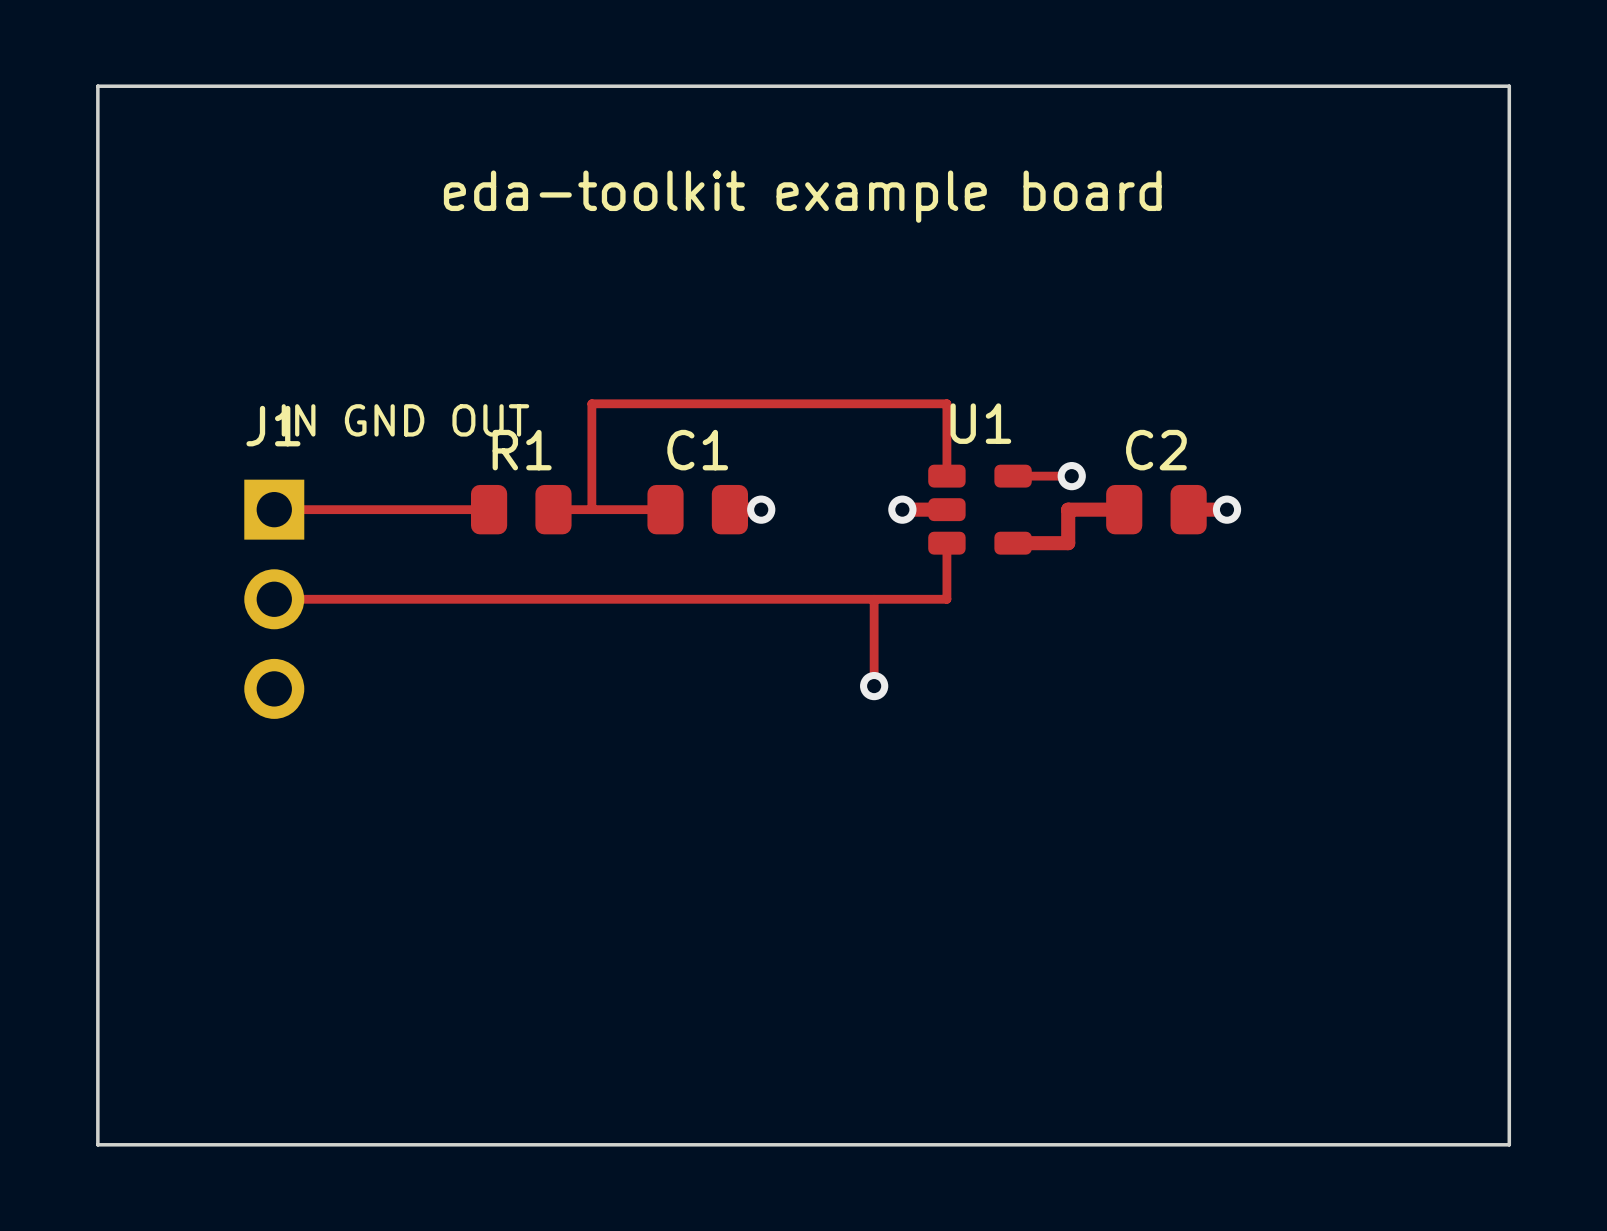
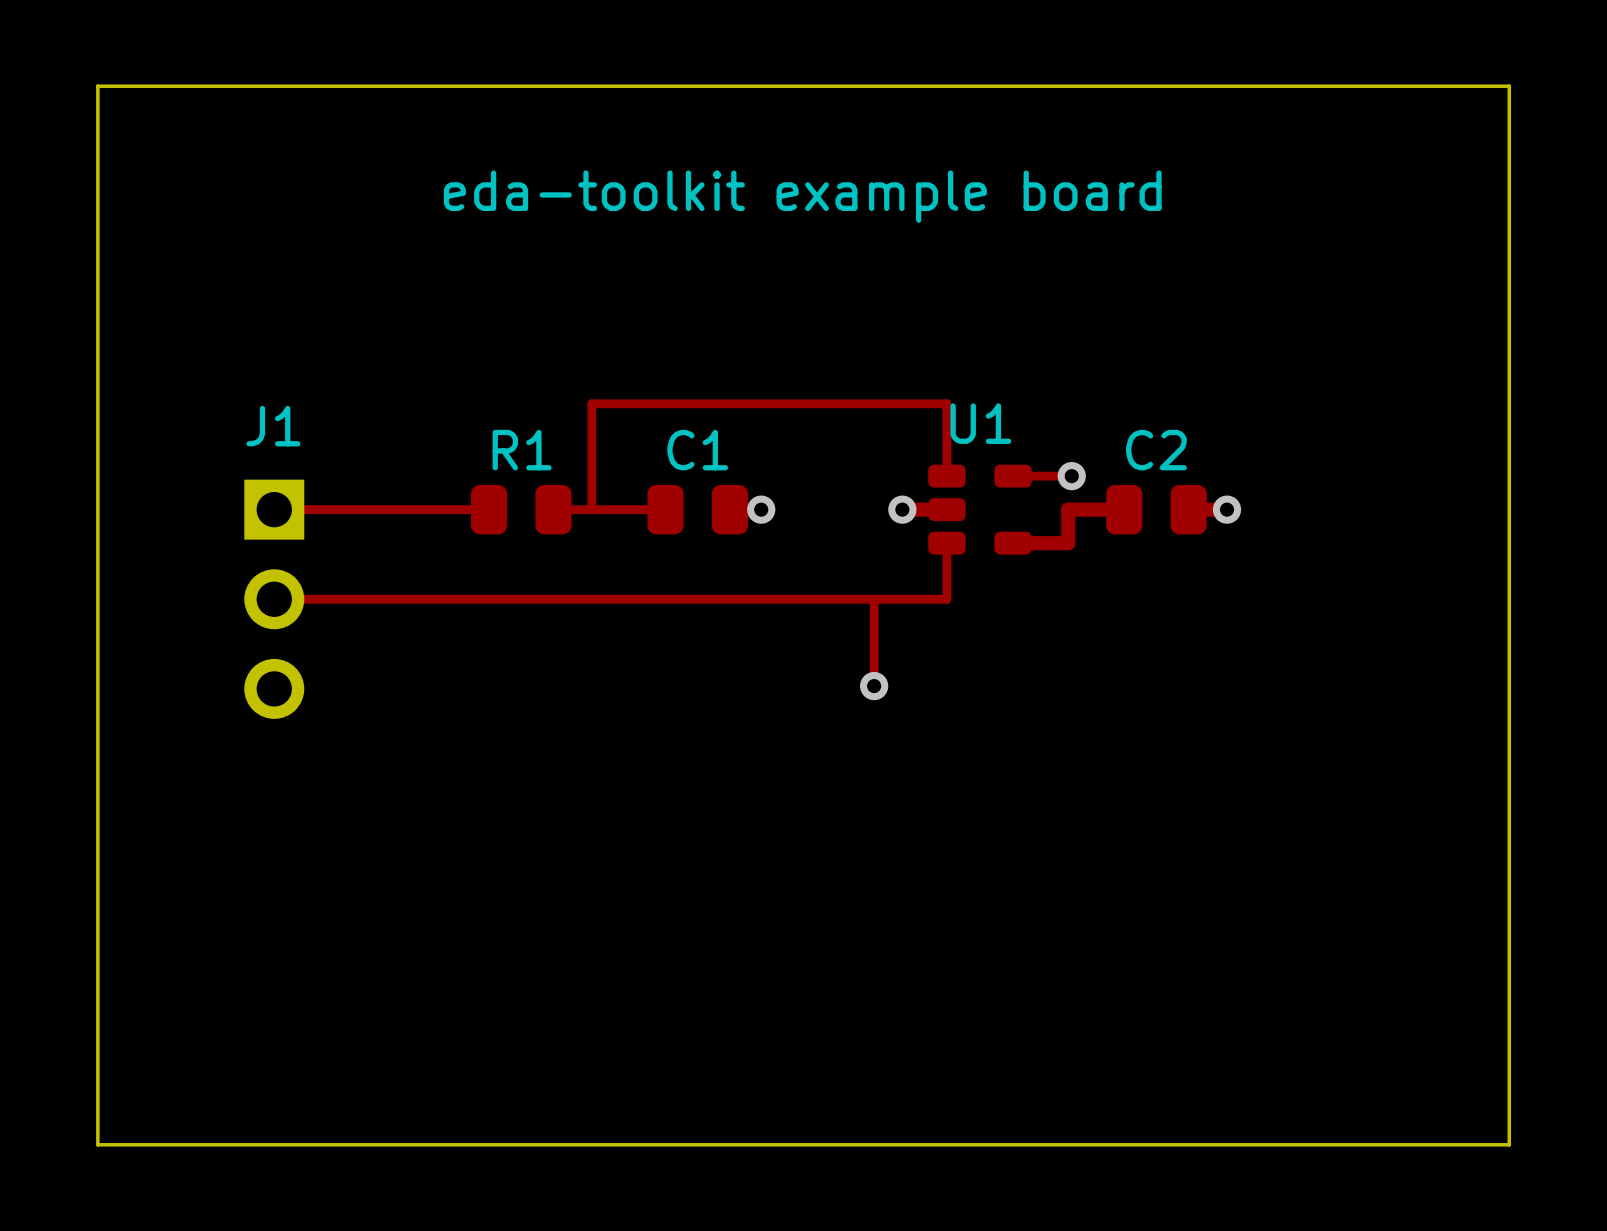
text: IN GND OUT (405, 420) -> none

